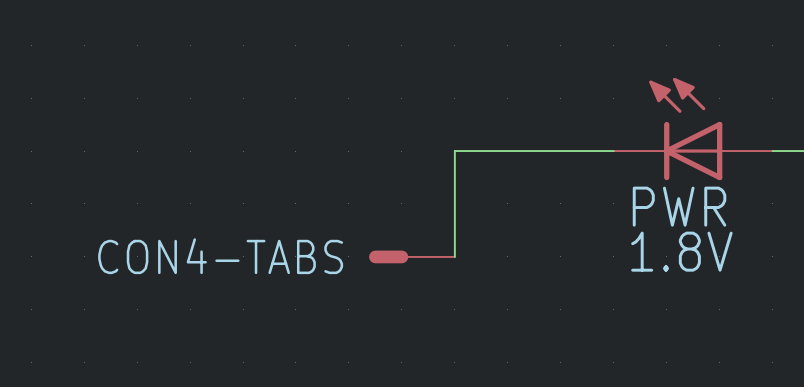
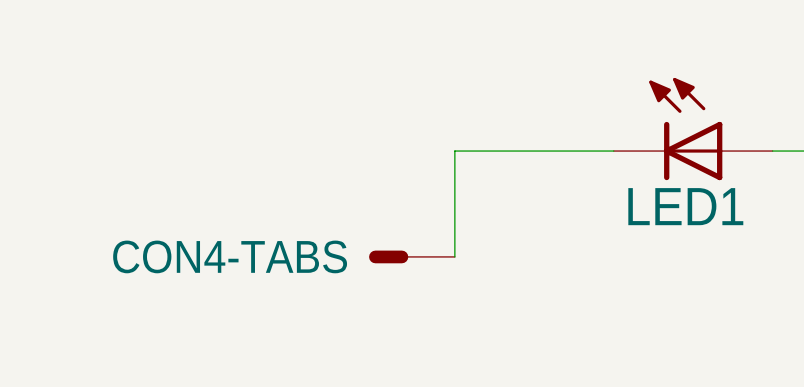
PWR name: PWR (679, 206) -> LED1 (685, 206)
PWR value: 1.8V (681, 251) -> none

